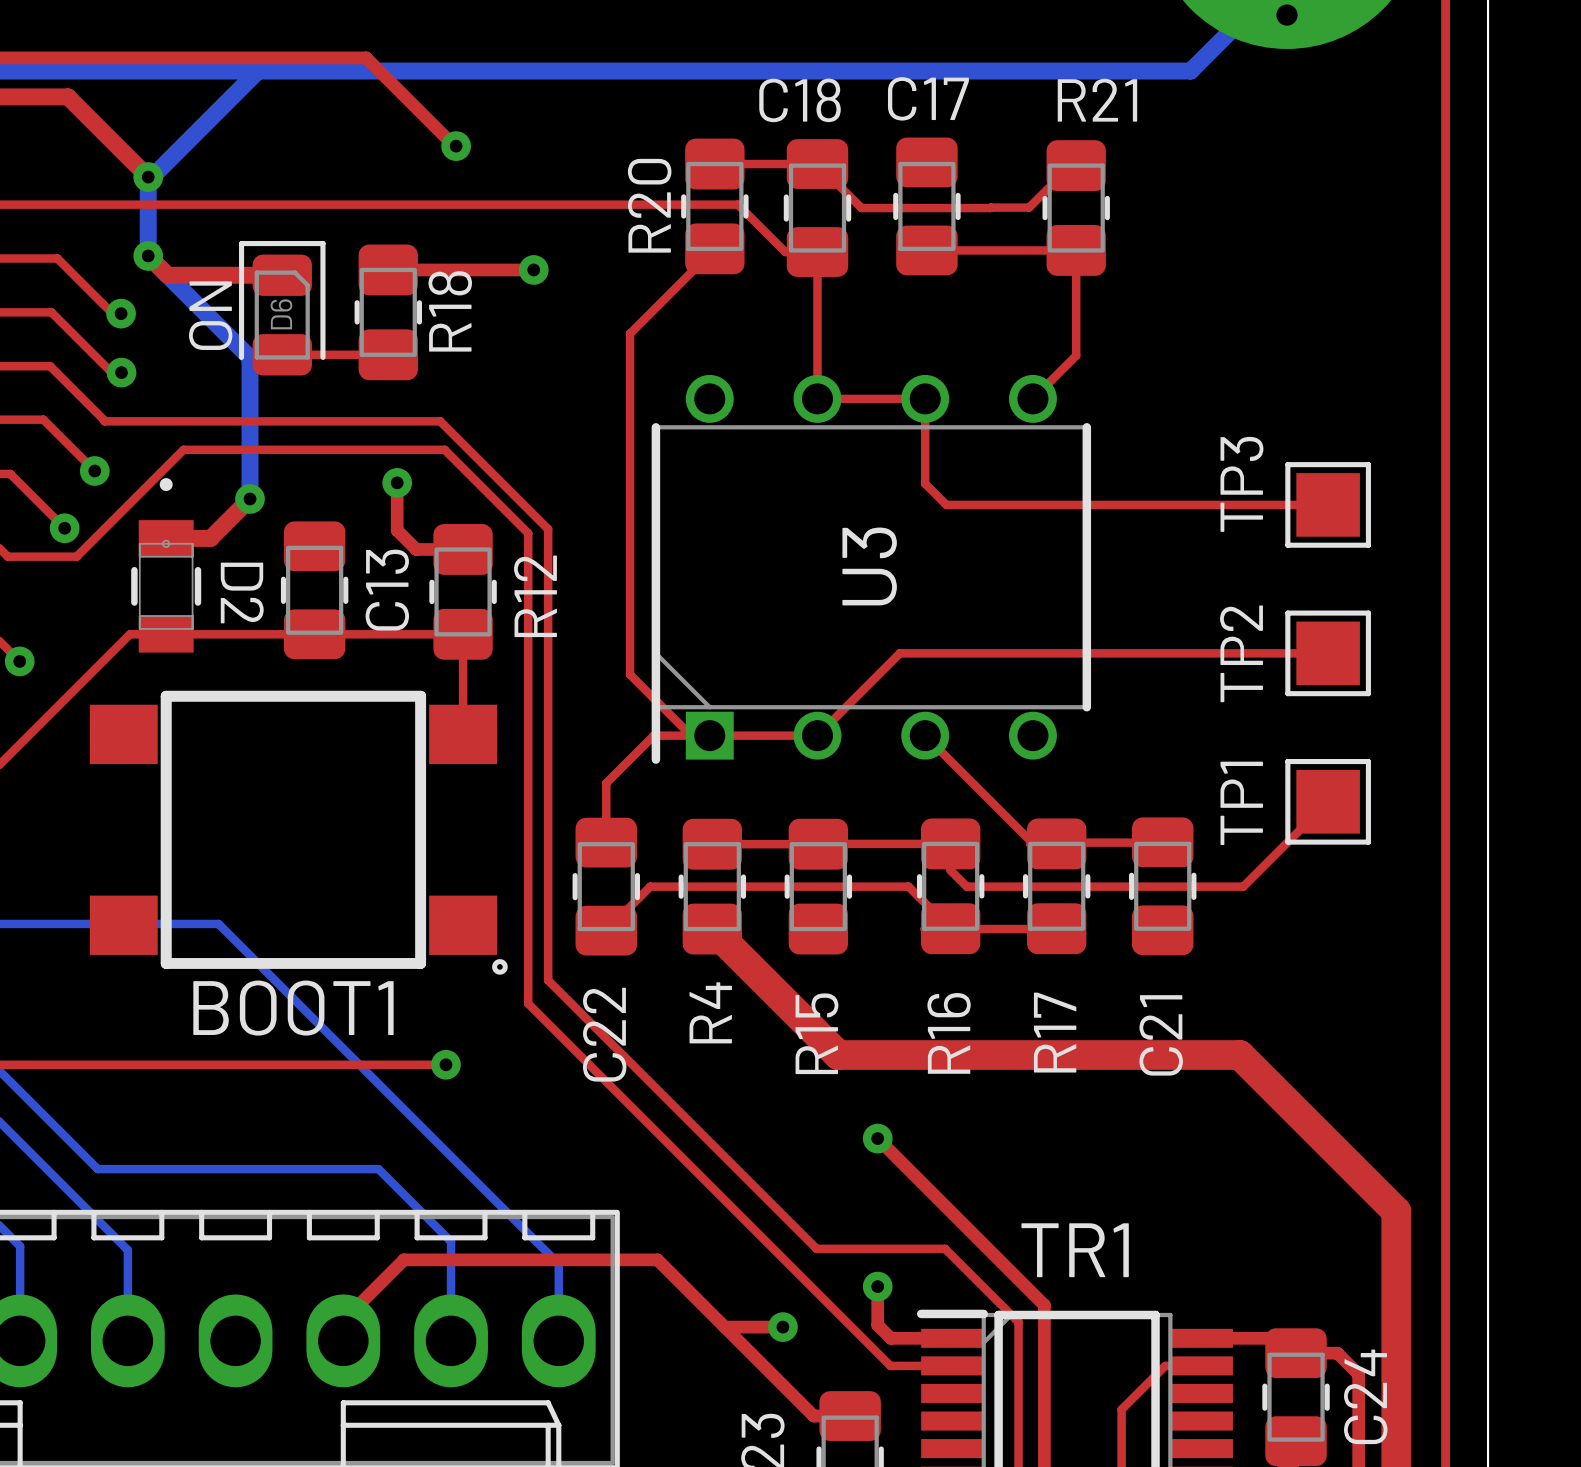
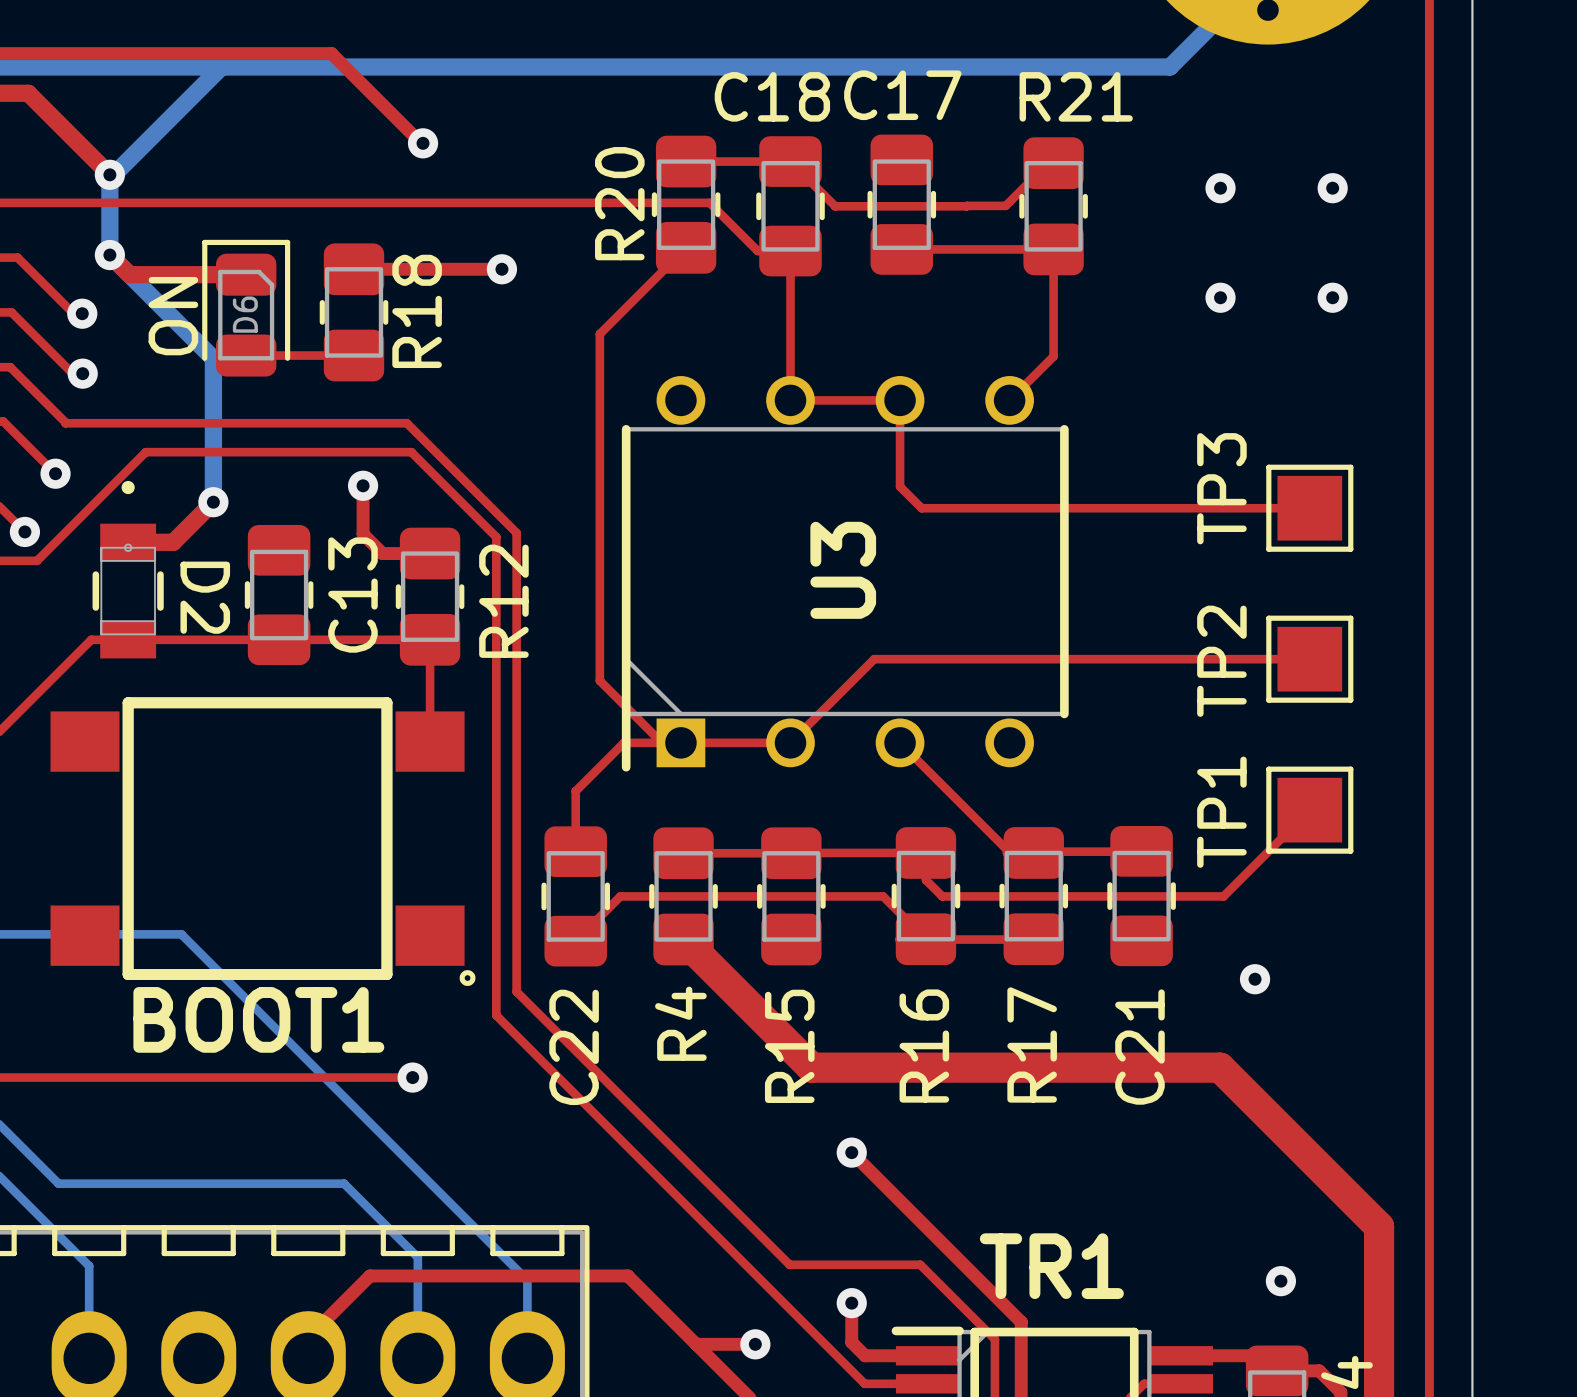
via: none -> (1220, 188)
via: none -> (1332, 188)
via: none -> (1220, 297)
via: none -> (1332, 297)
via: none -> (1255, 979)
via: none -> (1280, 1281)

